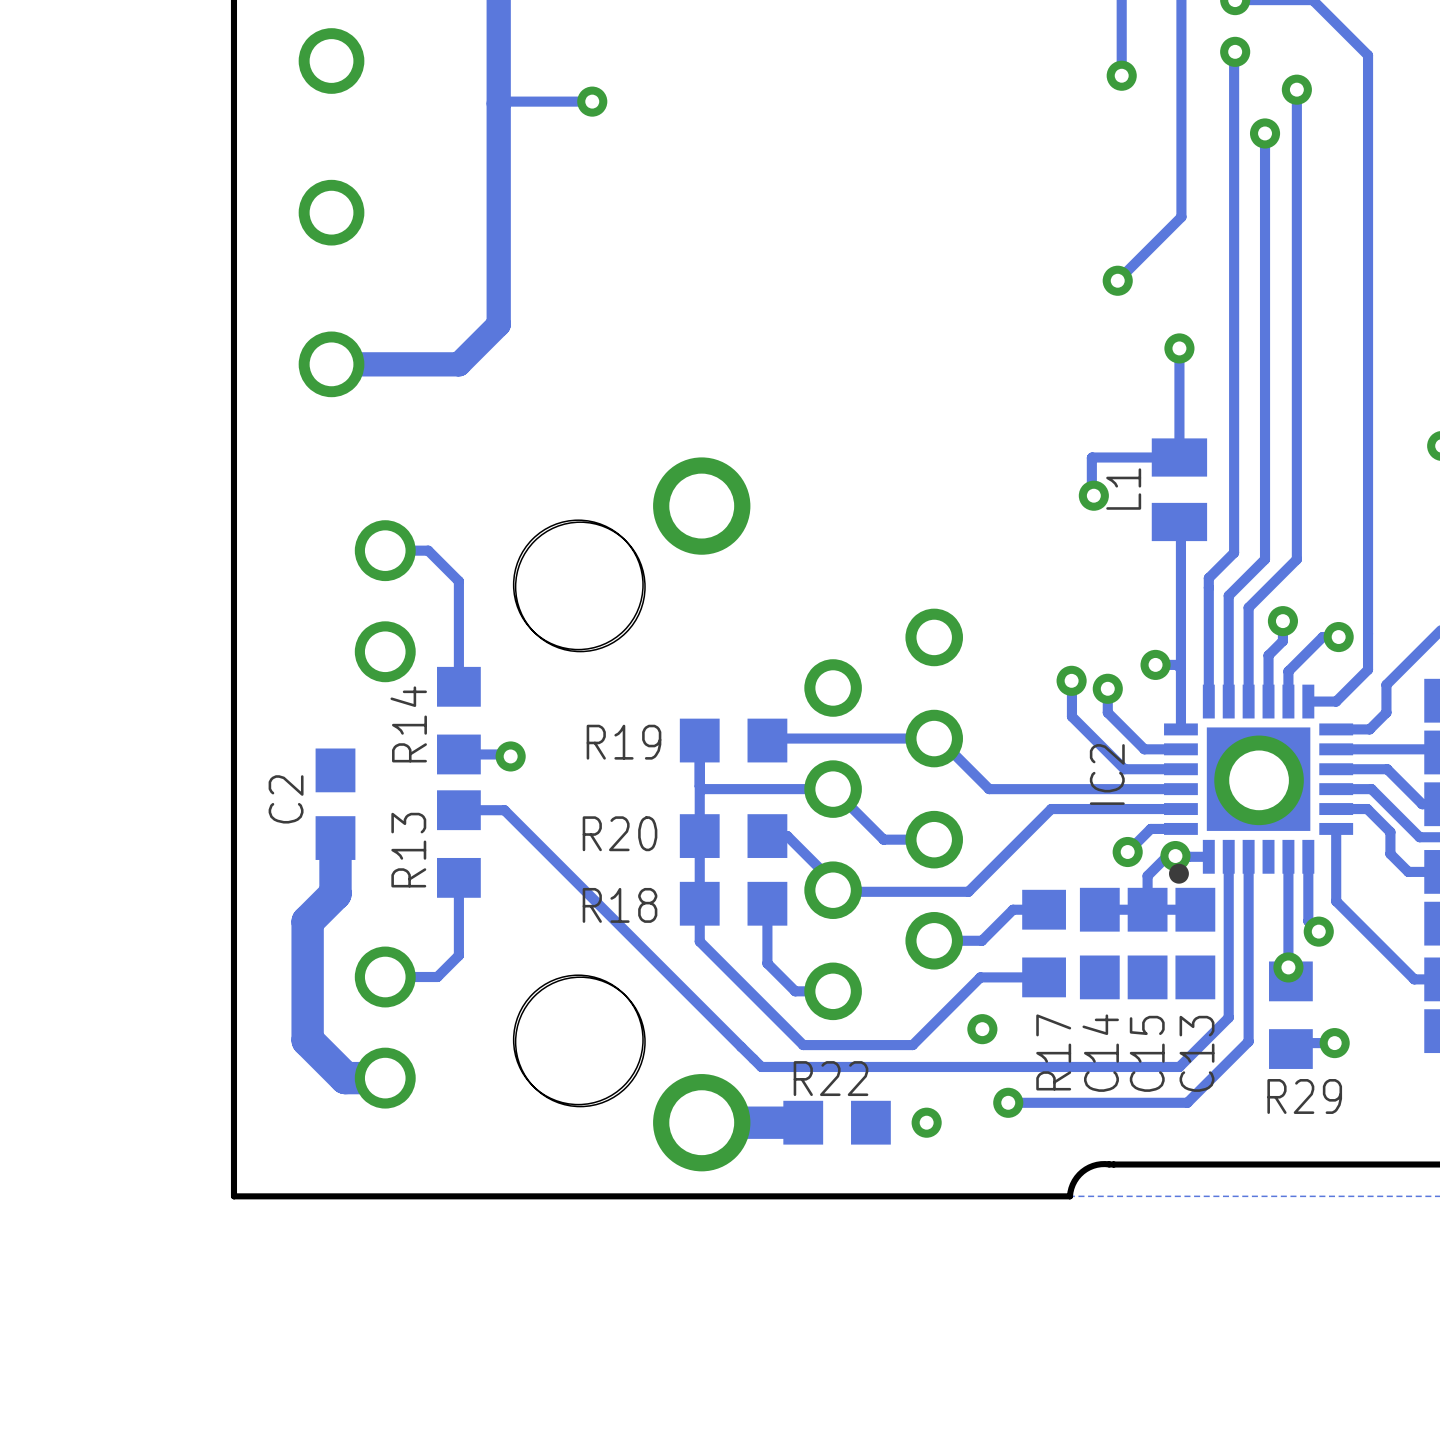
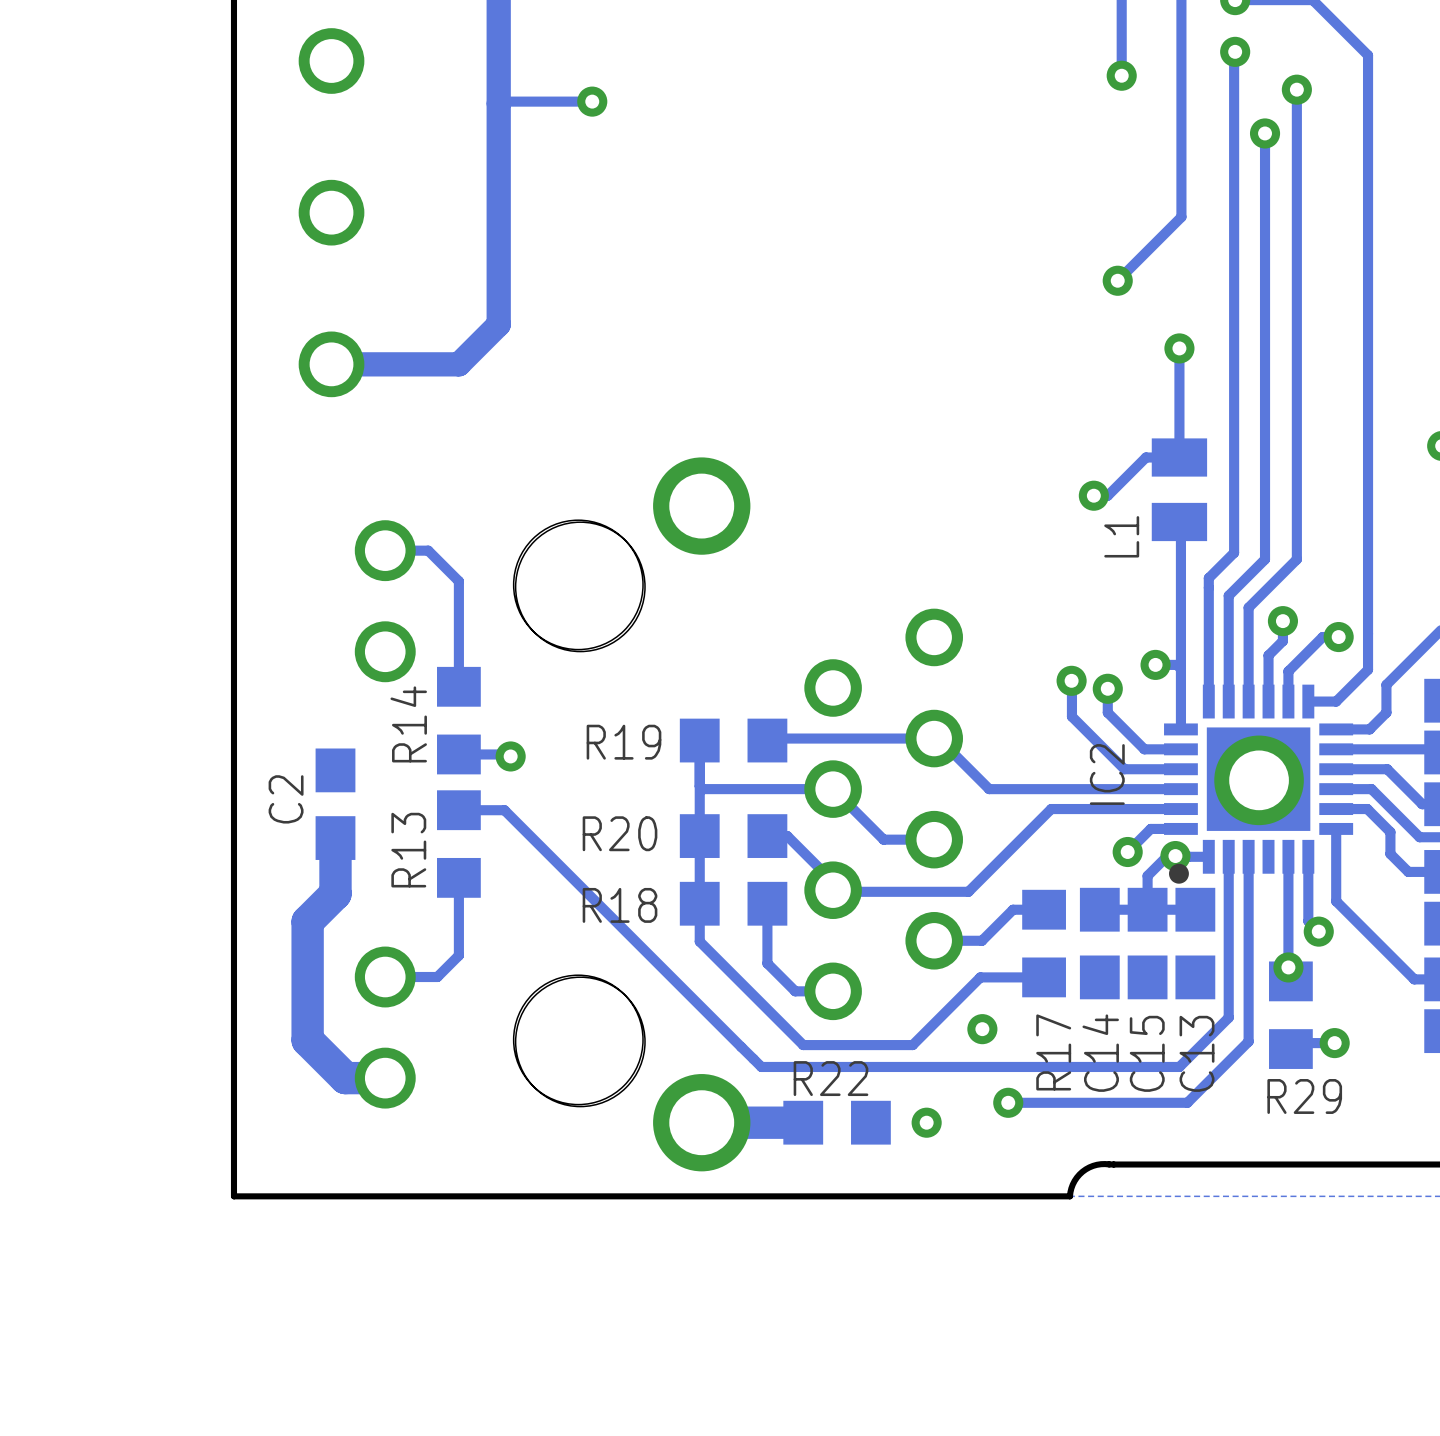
track: (1091, 457) (1091, 493) (1093, 495) -> none
track: (1146, 457) (1092, 457) -> (1146, 457) (1107, 495) (1093, 495)
L1 name position: L1 (1123, 489) -> L1 (1121, 536)

